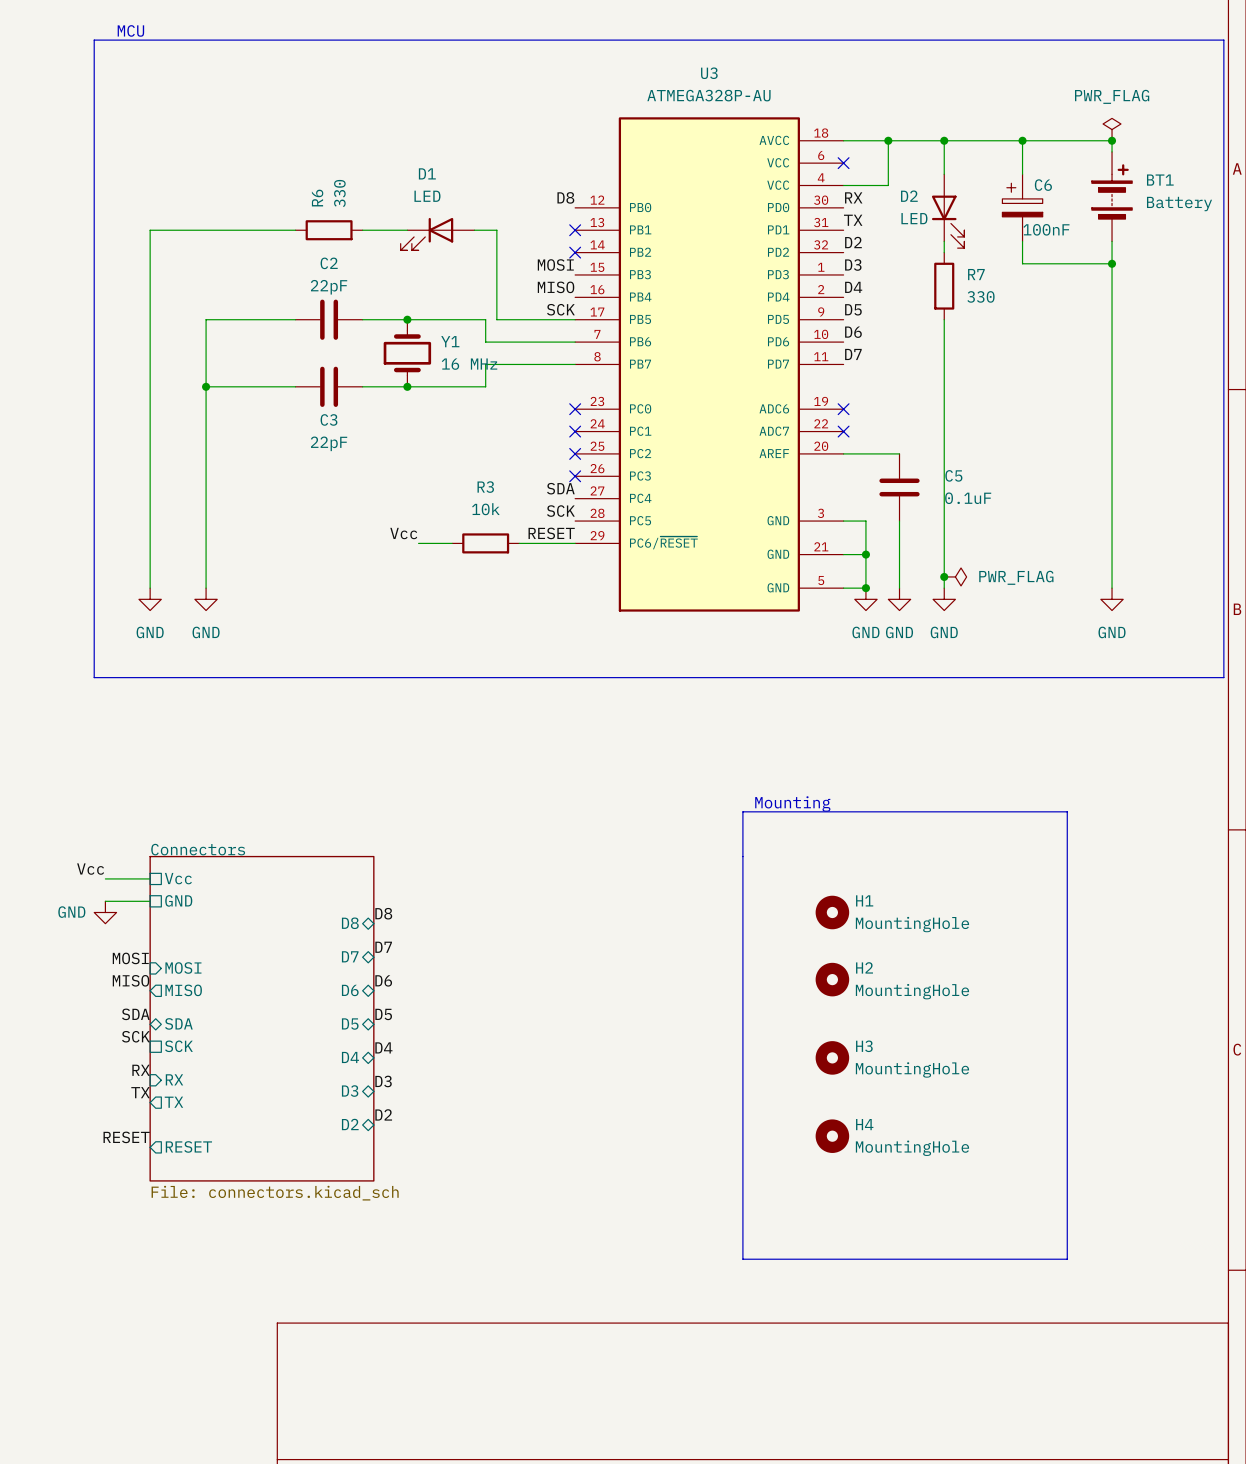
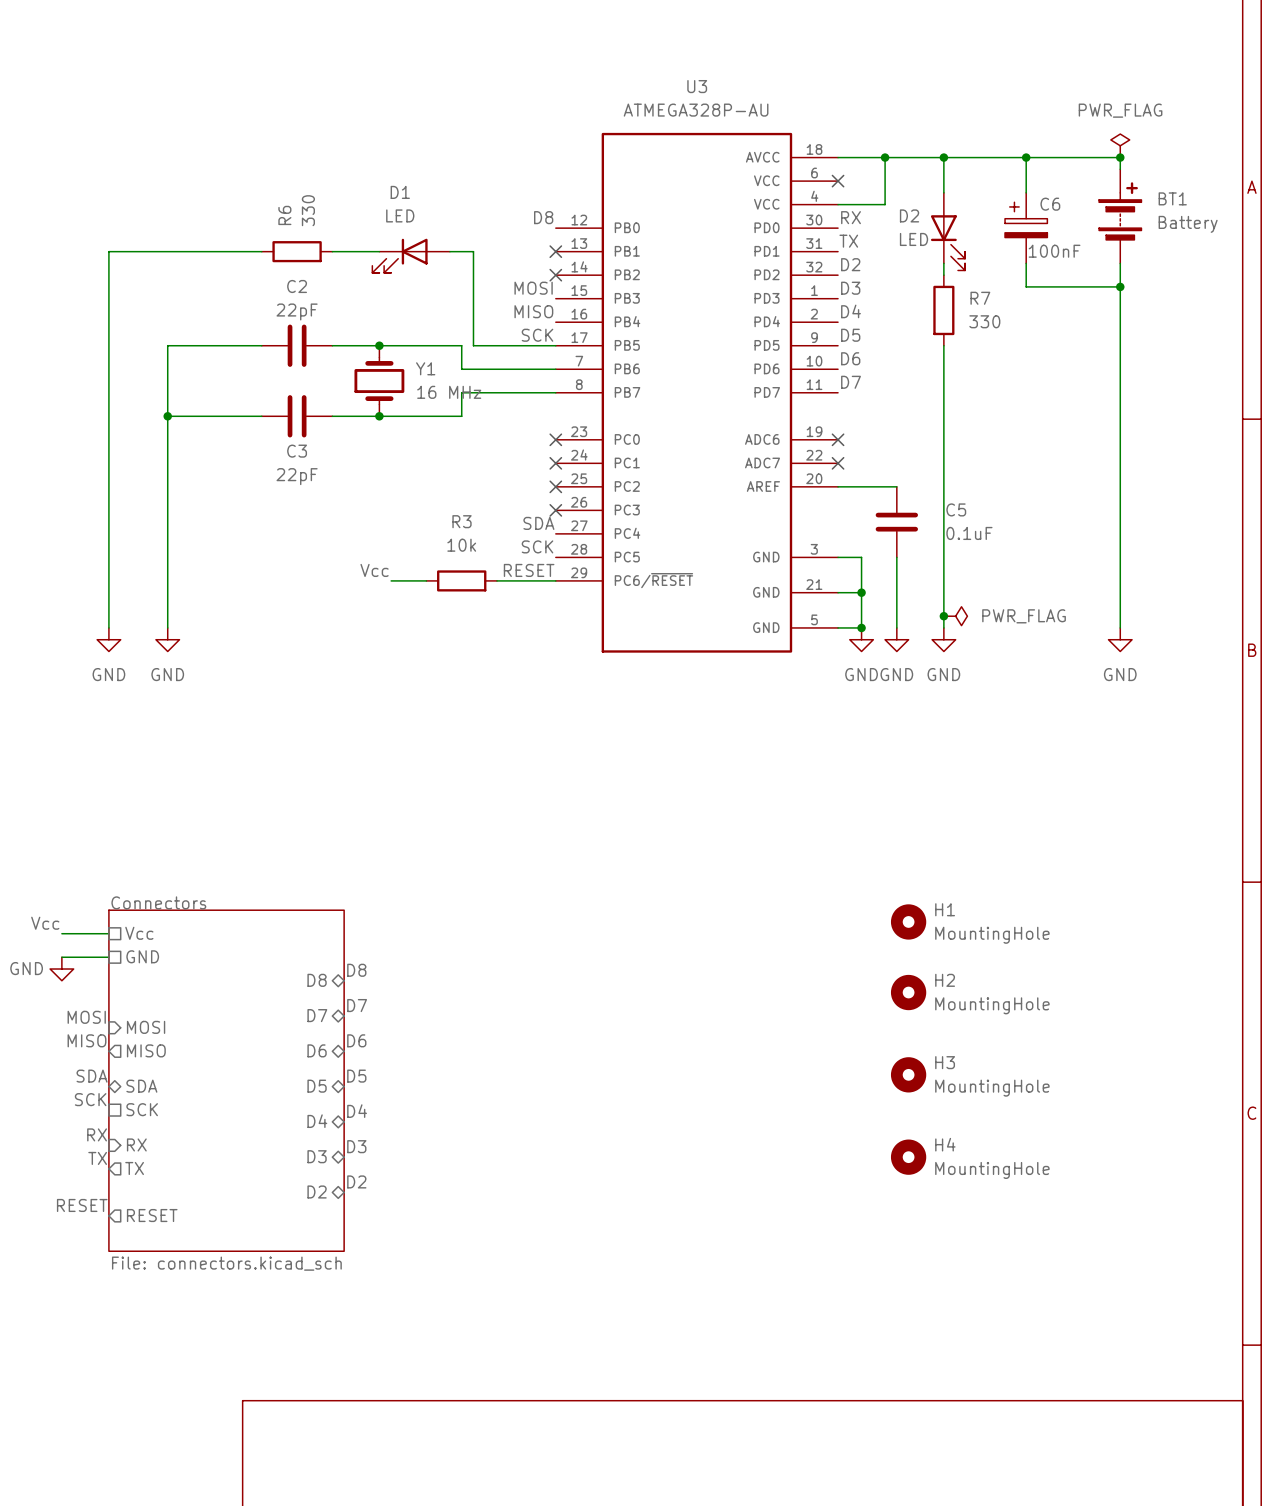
text: MCU (130, 30) -> none
line: (94, 40) (1223, 40) (1223, 677) (94, 677) (94, 40) -> none
text: Mounting (792, 803) -> none
line: (742, 811) (742, 1259) (1067, 1259) (1067, 811) (742, 811) -> none
H1 position: (832, 912) -> (908, 921)
H2 position: (832, 979) -> (908, 992)
H3 position: (832, 1057) -> (908, 1074)
H4 position: (832, 1136) -> (908, 1157)

